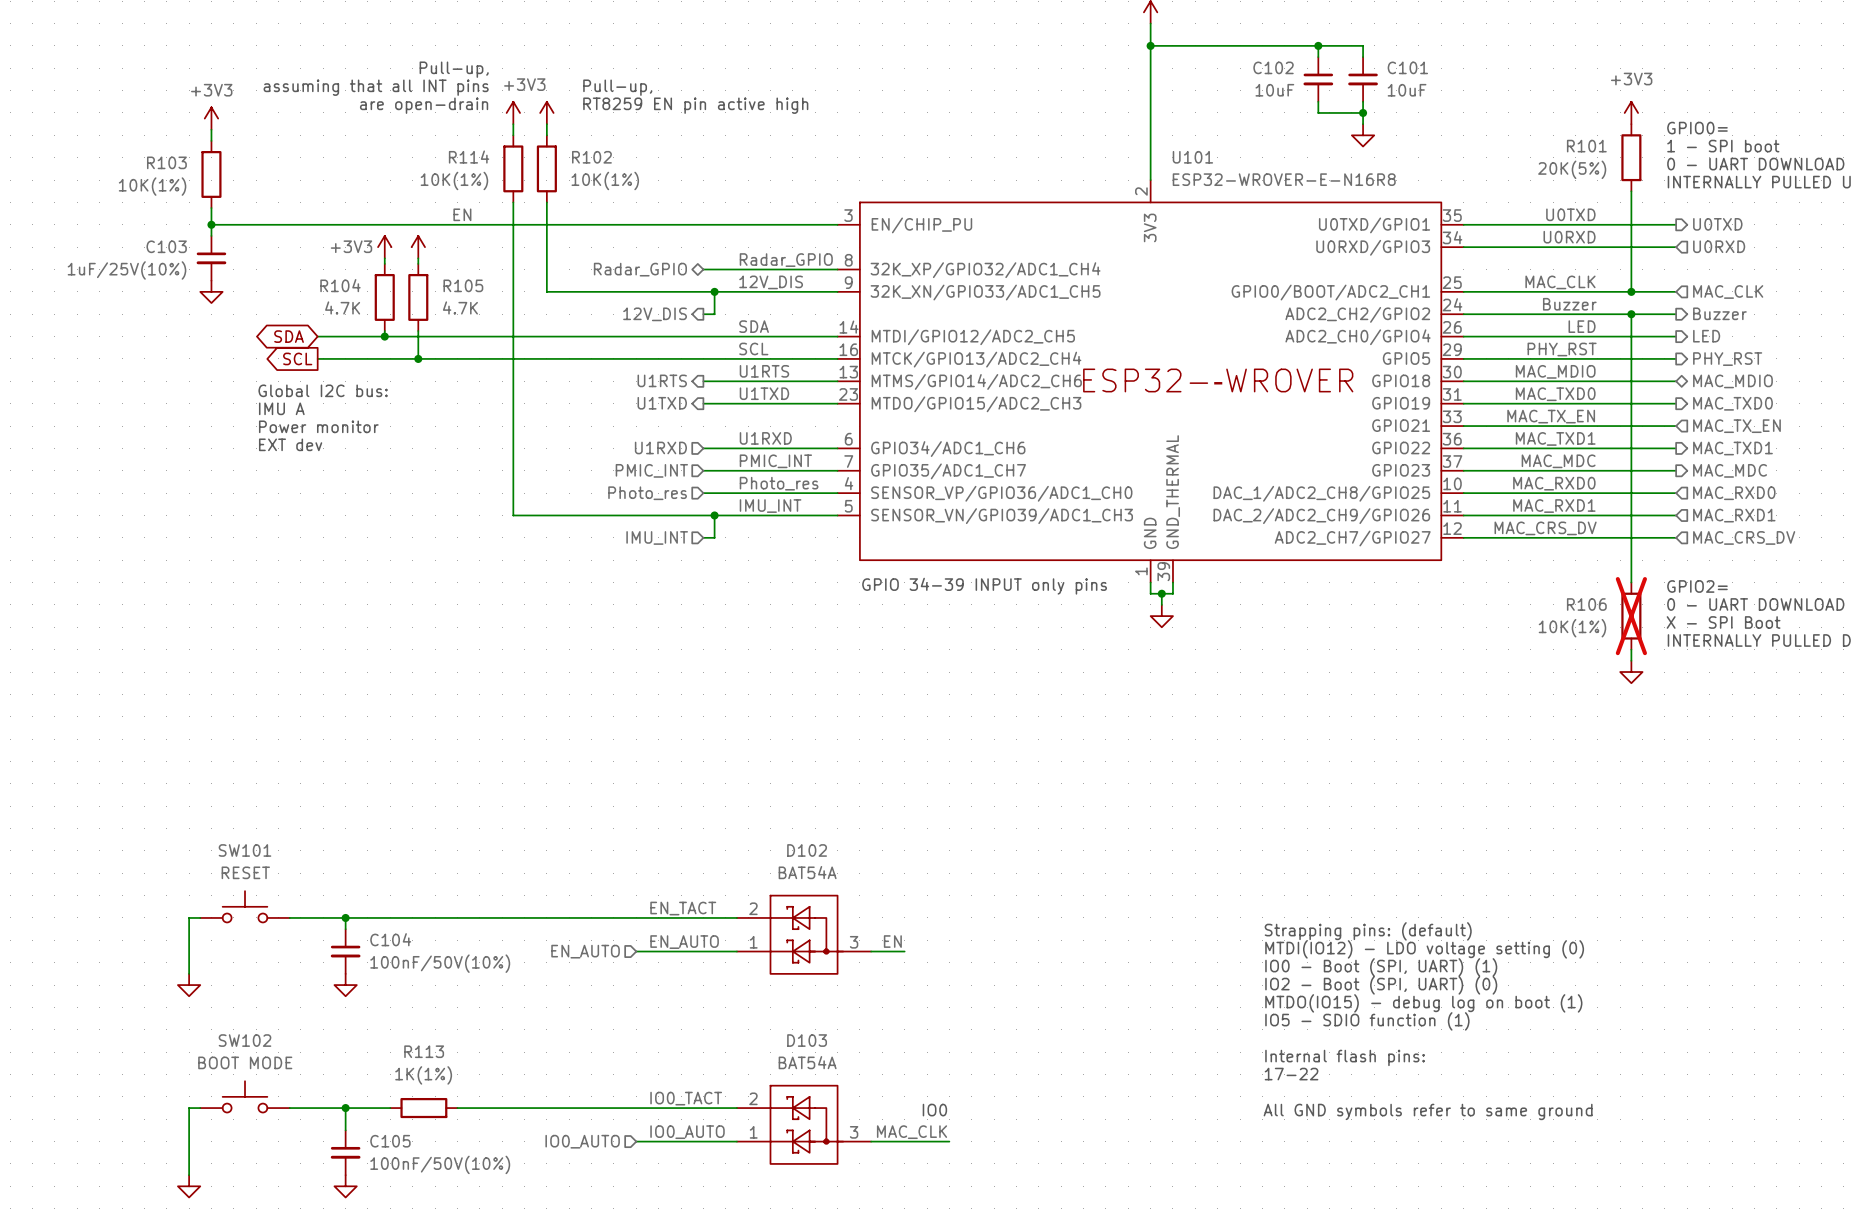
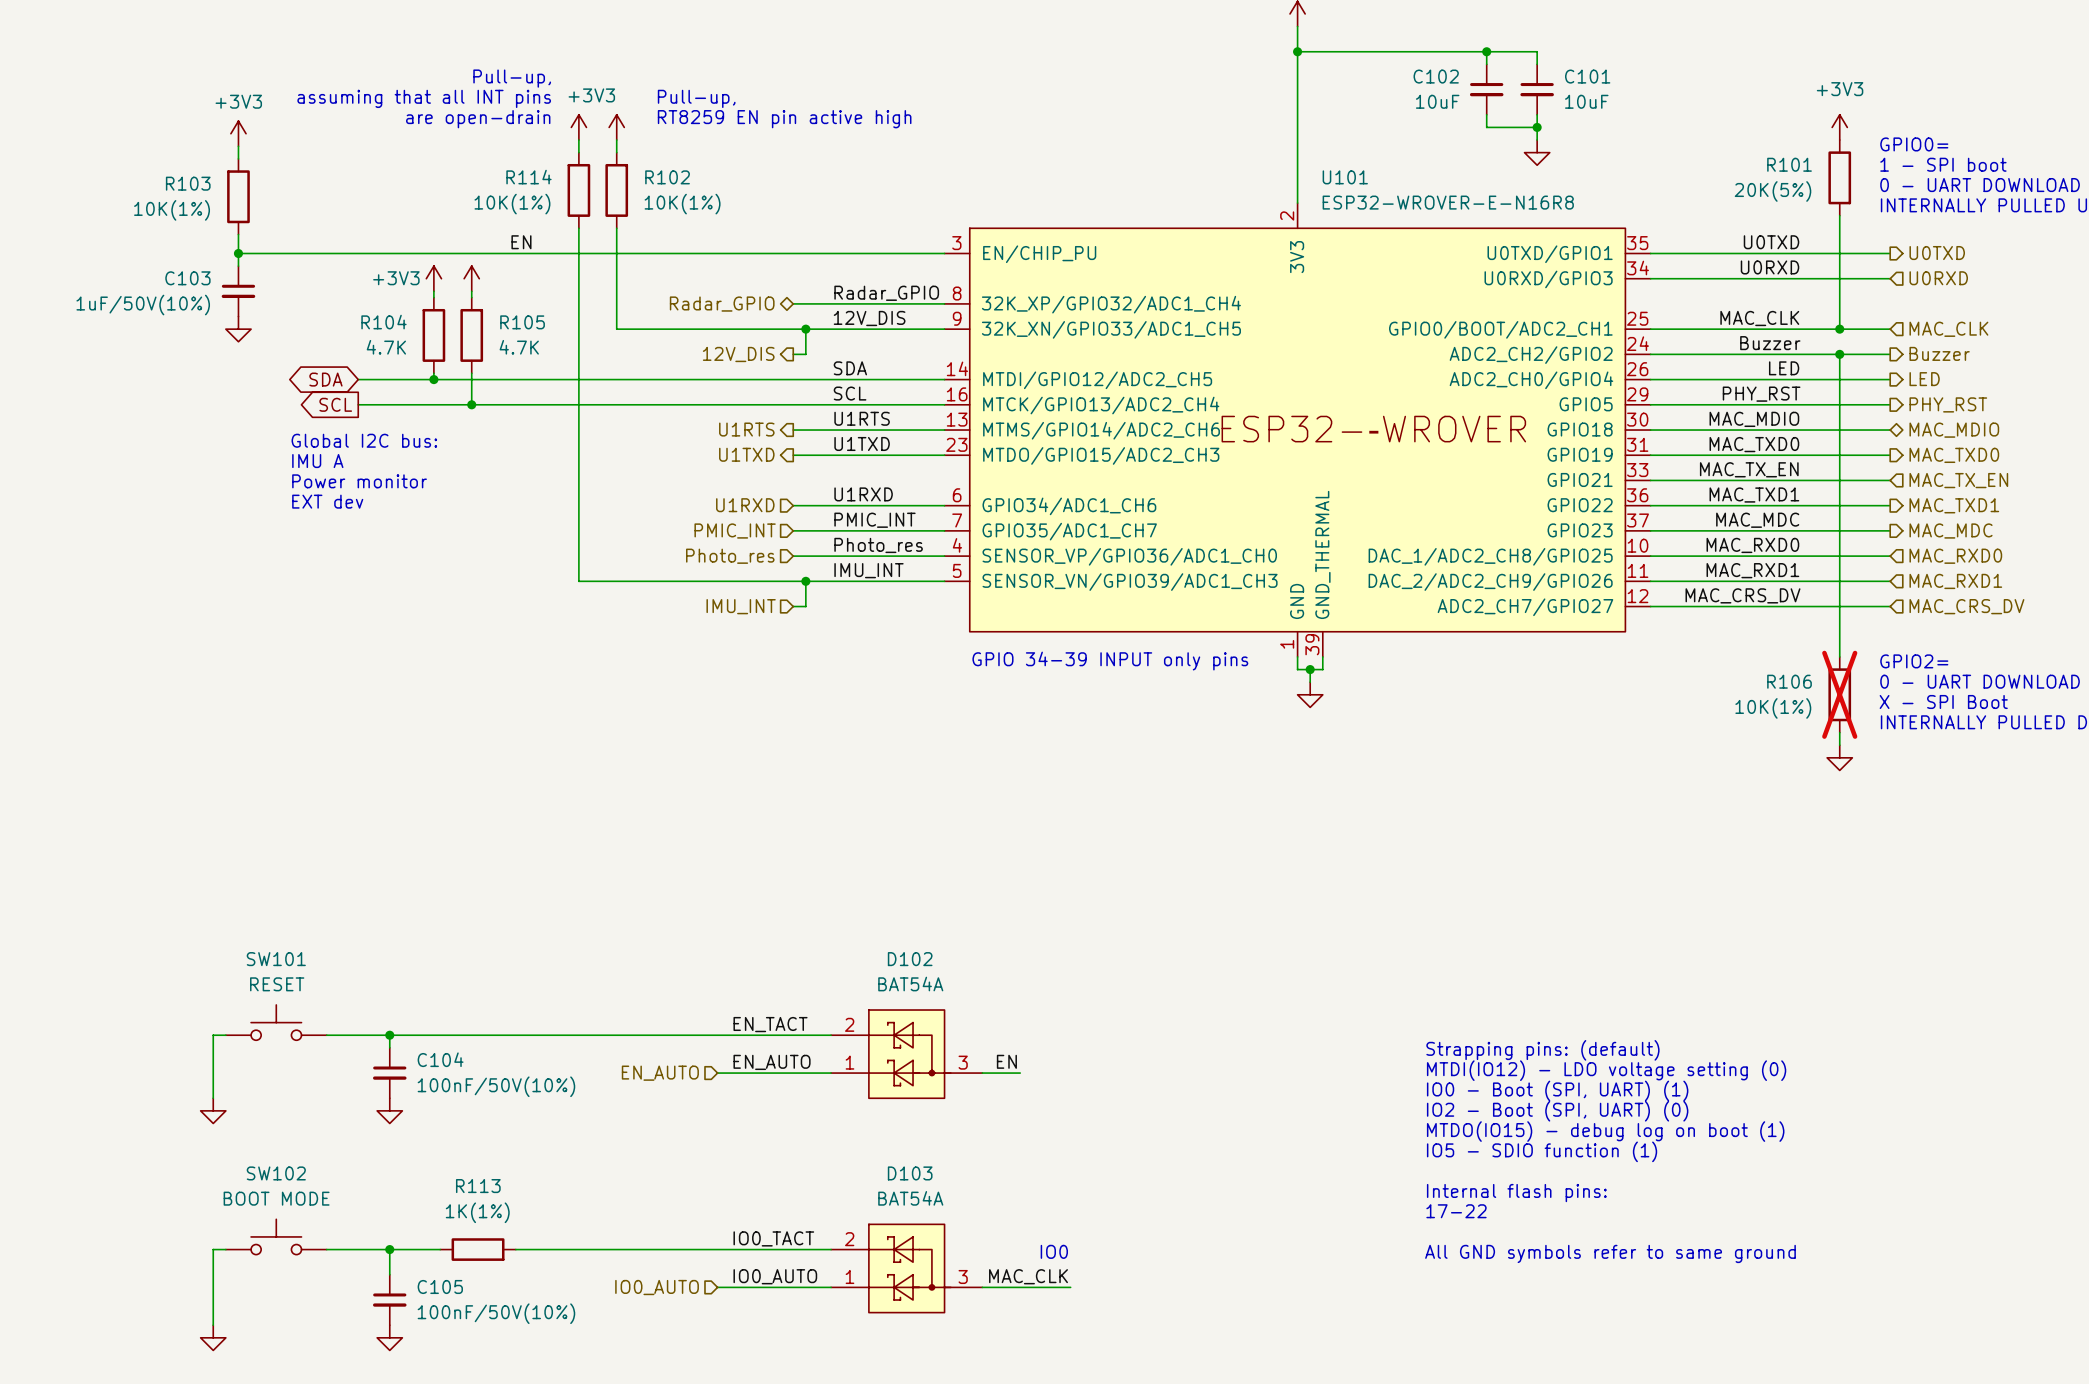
C103 value: 1uF/25V(10%) (126, 270) -> 1uF/50V(10%) (143, 305)

